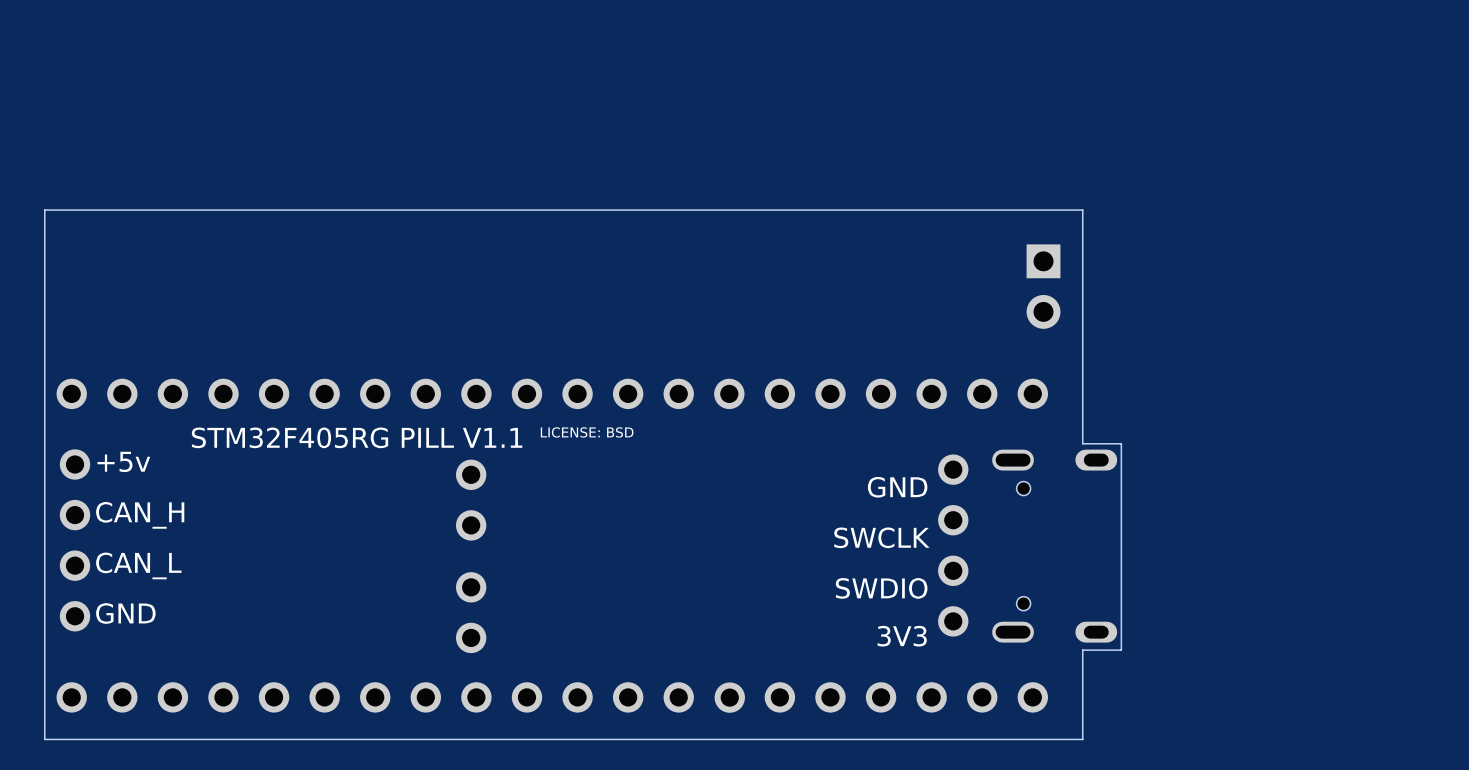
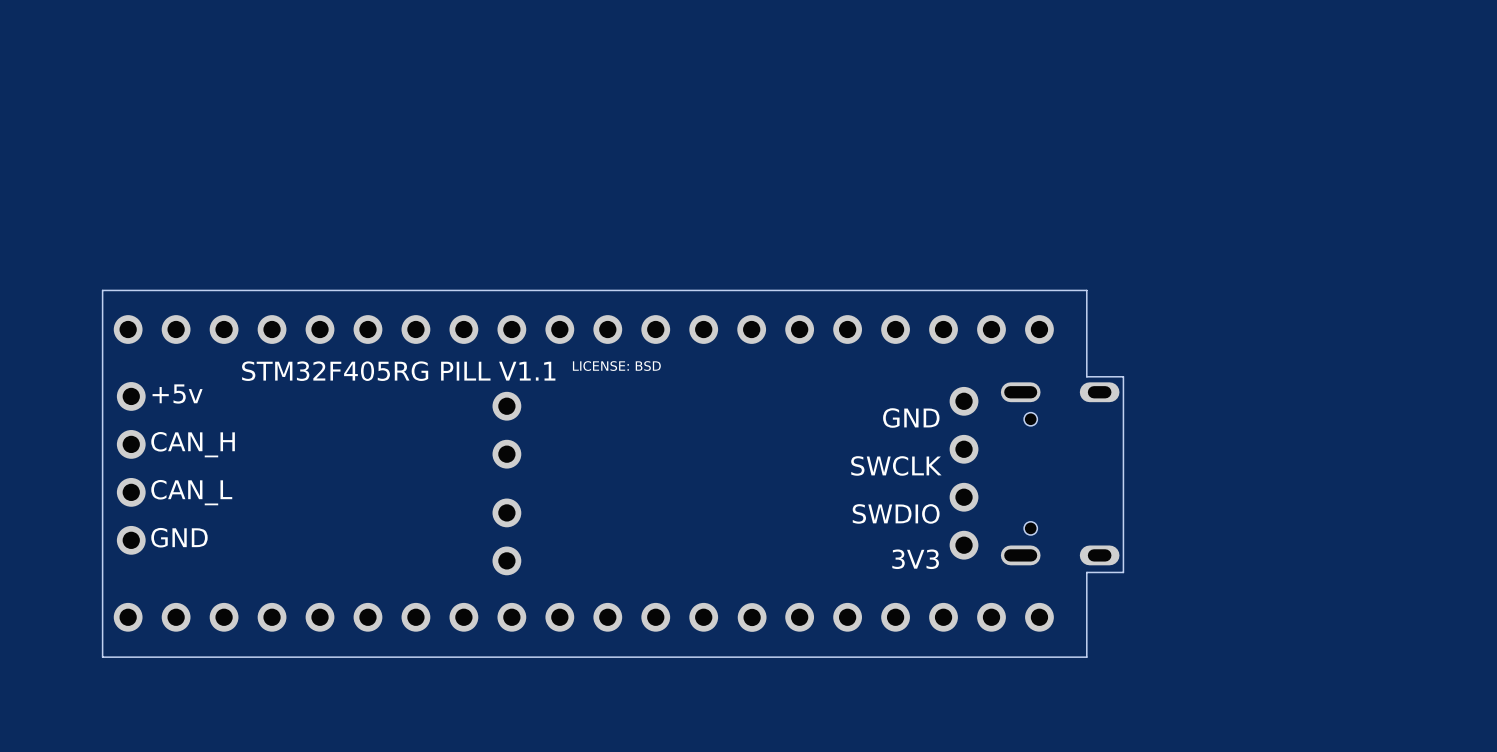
part: (1043, 286) -> none
board edge: (1082, 352) (1082, 210) (44, 210) (44, 352) -> (1086, 290) (102, 290)

